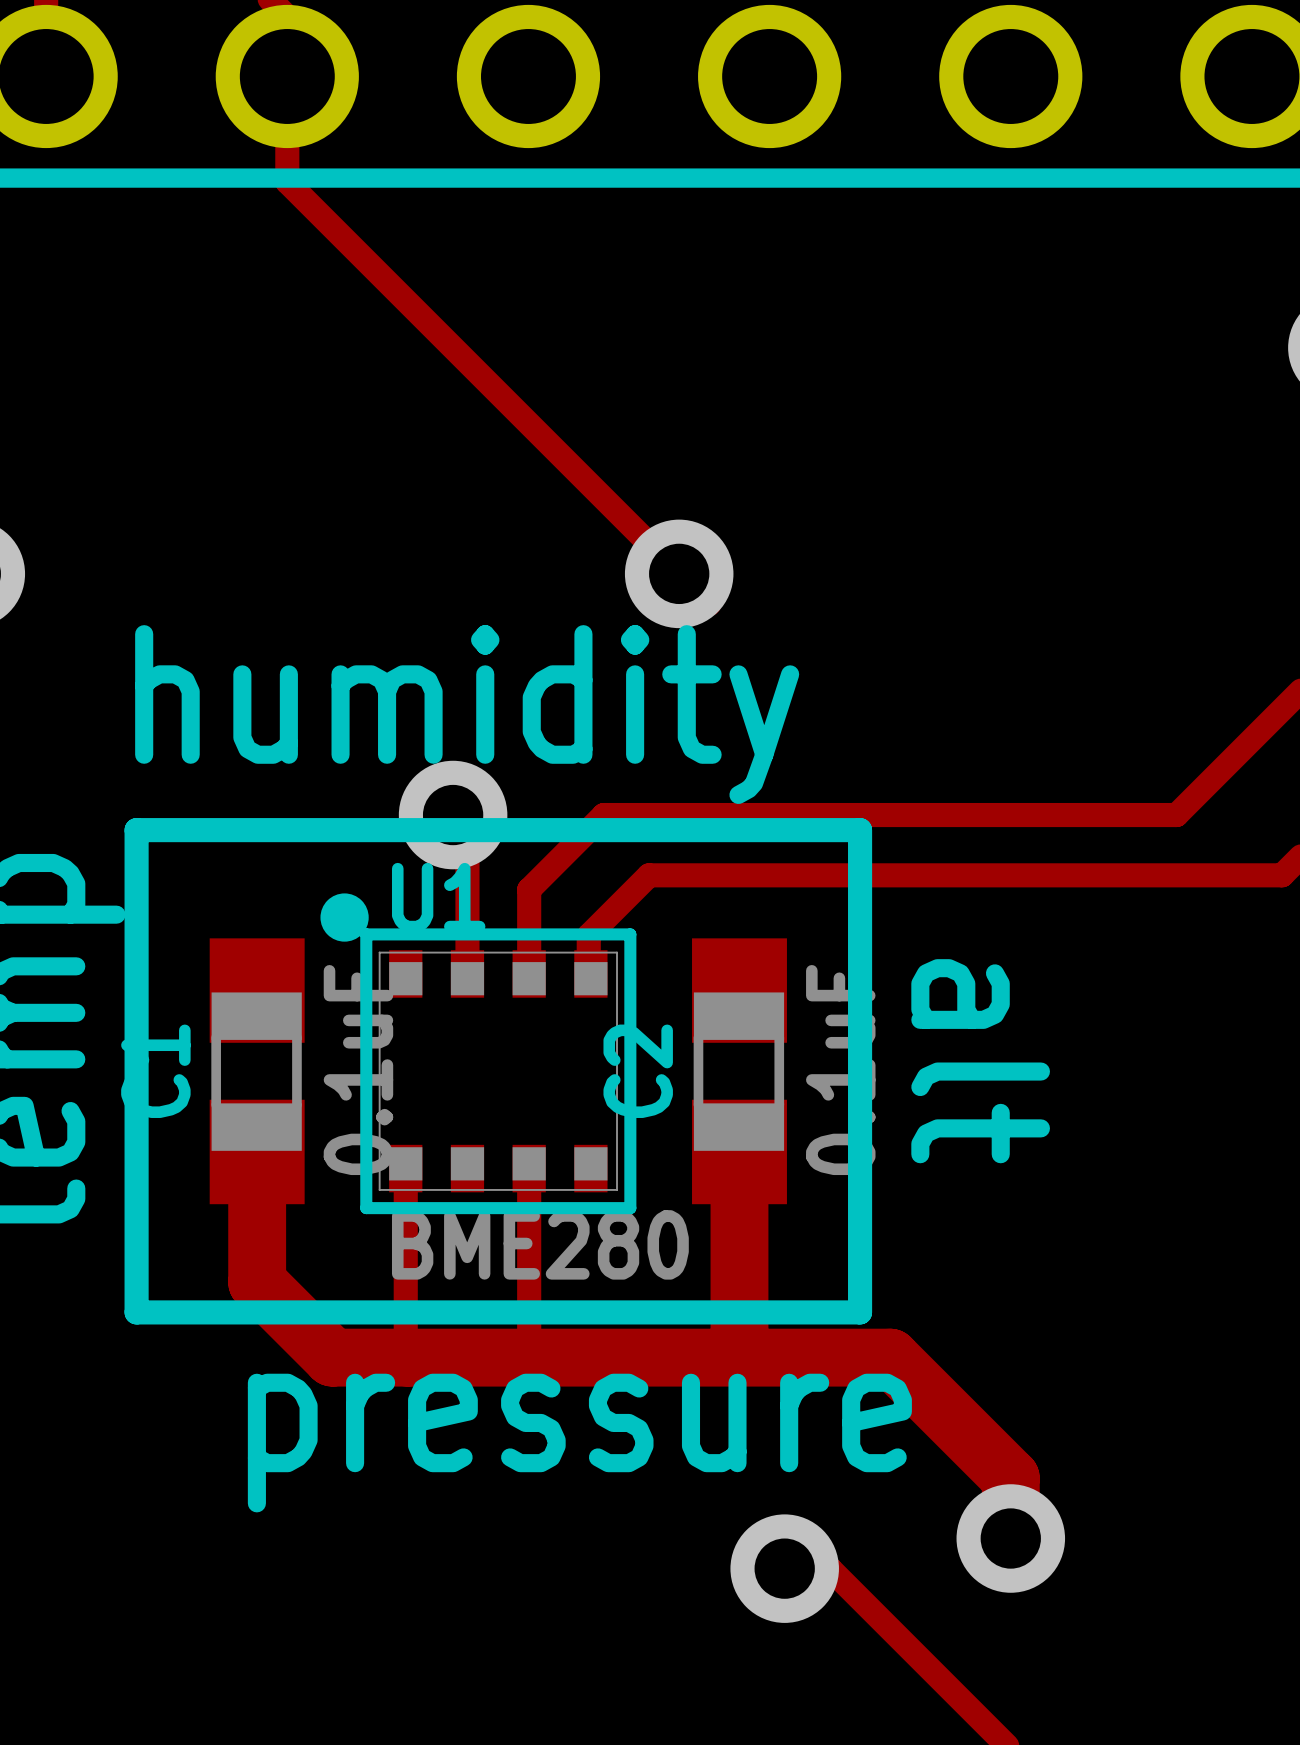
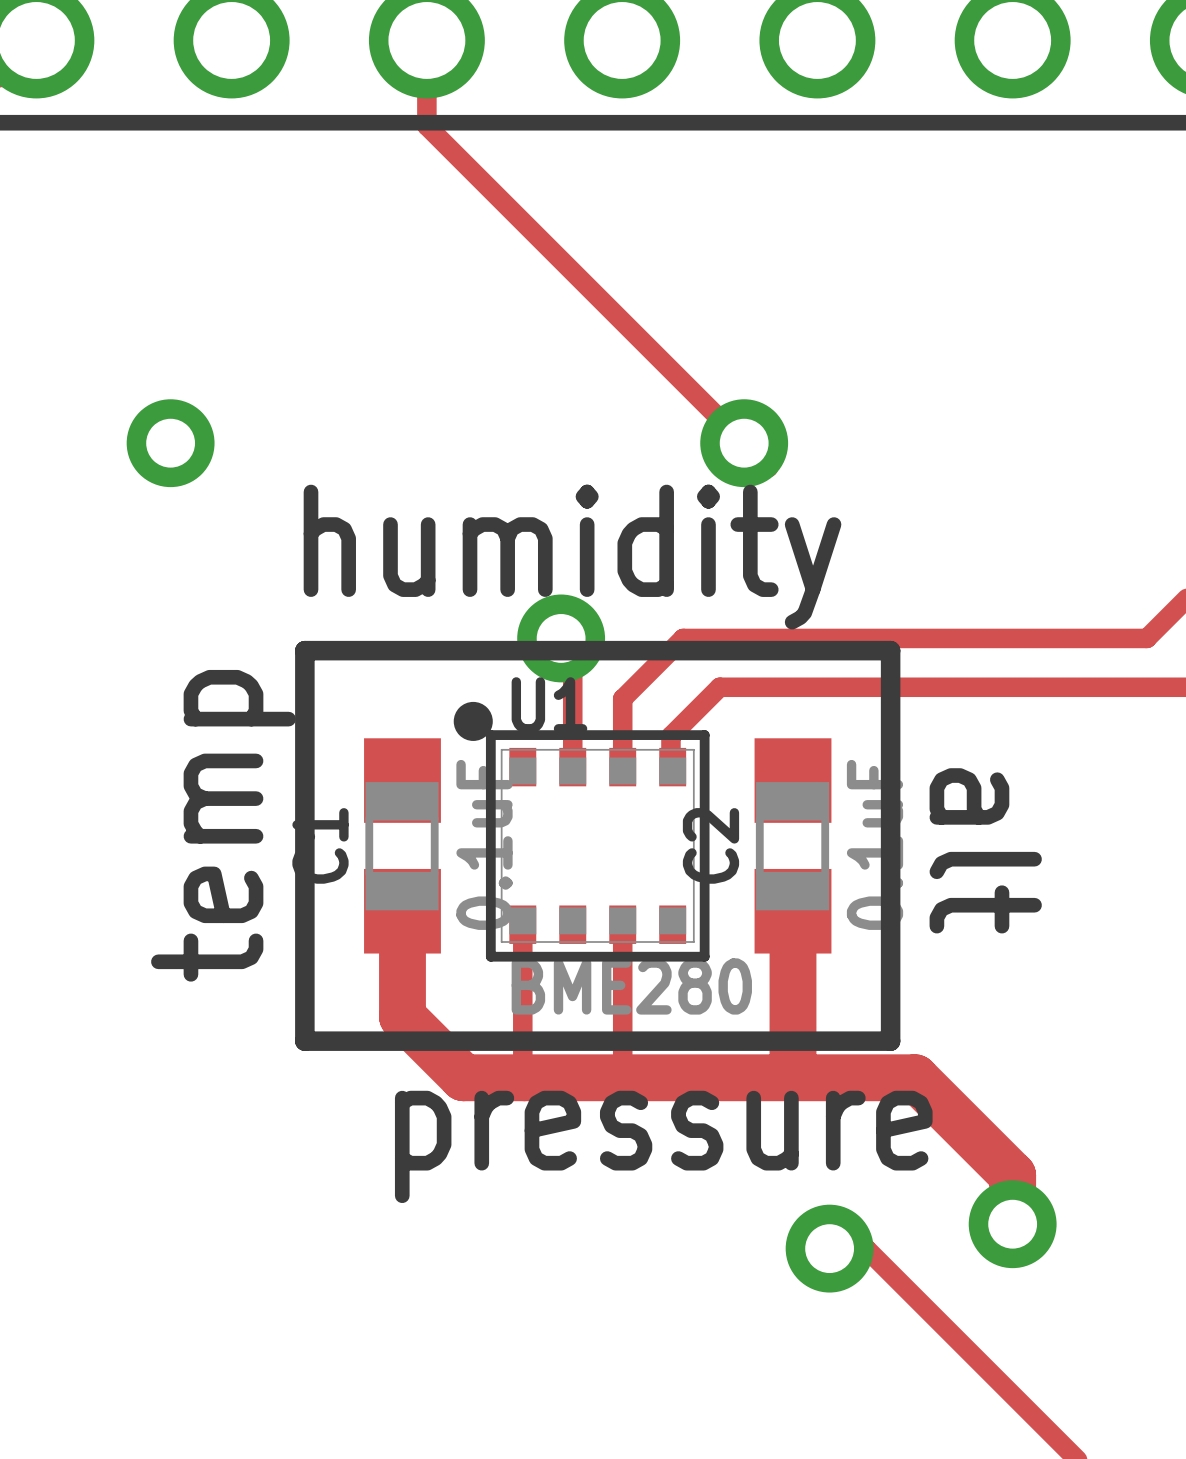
text position: alt (980, 1061) -> alt (985, 850)

